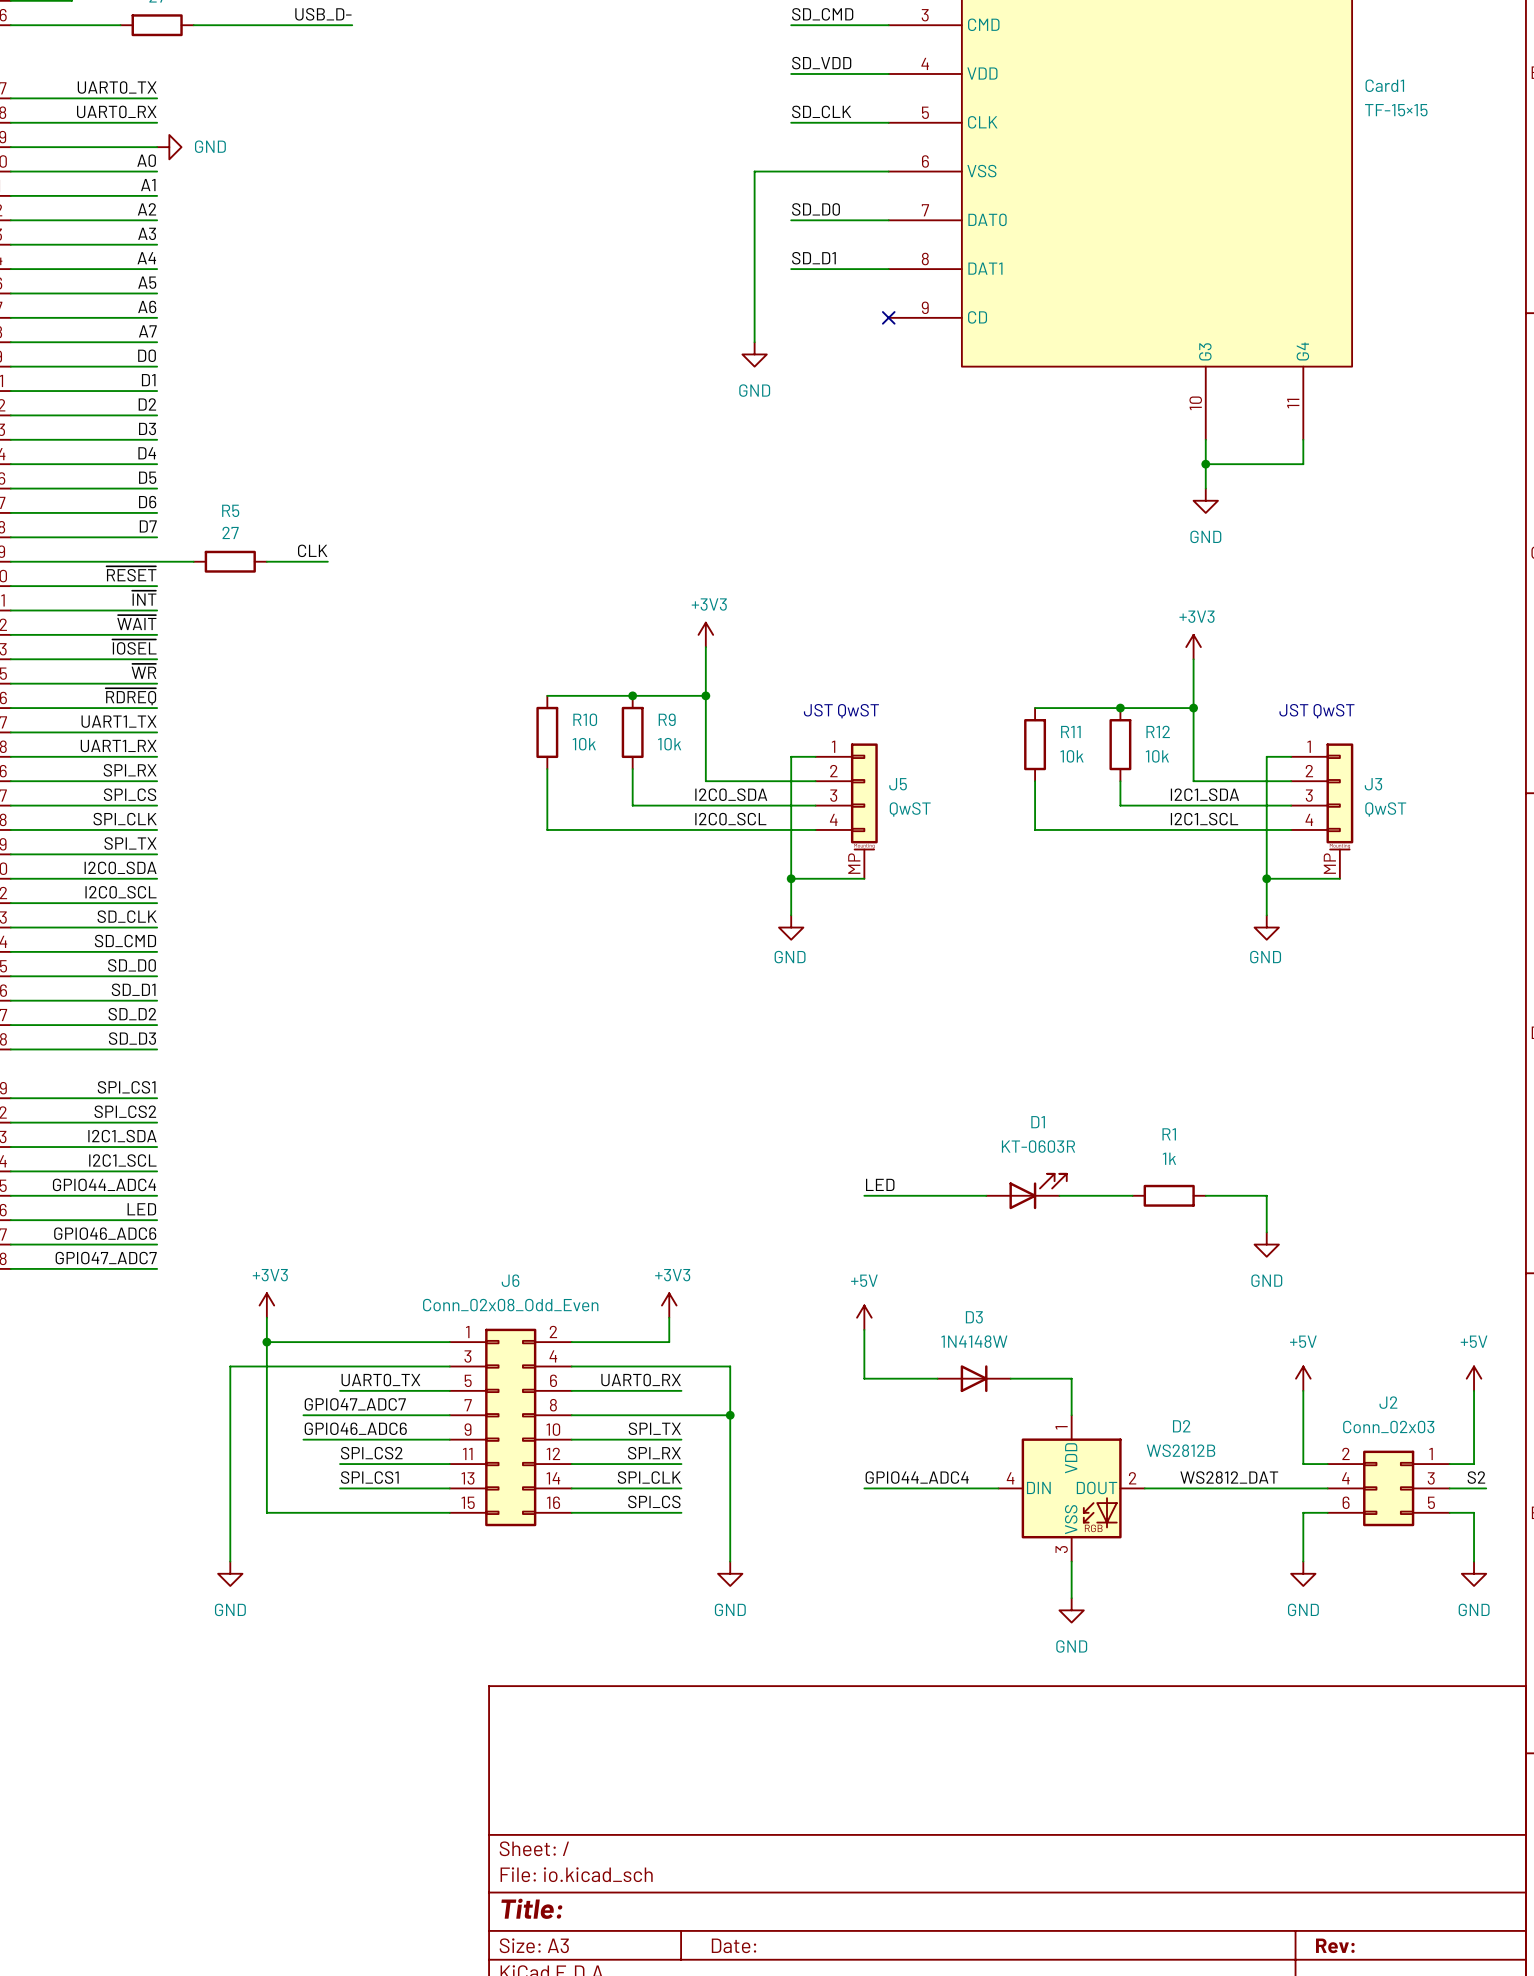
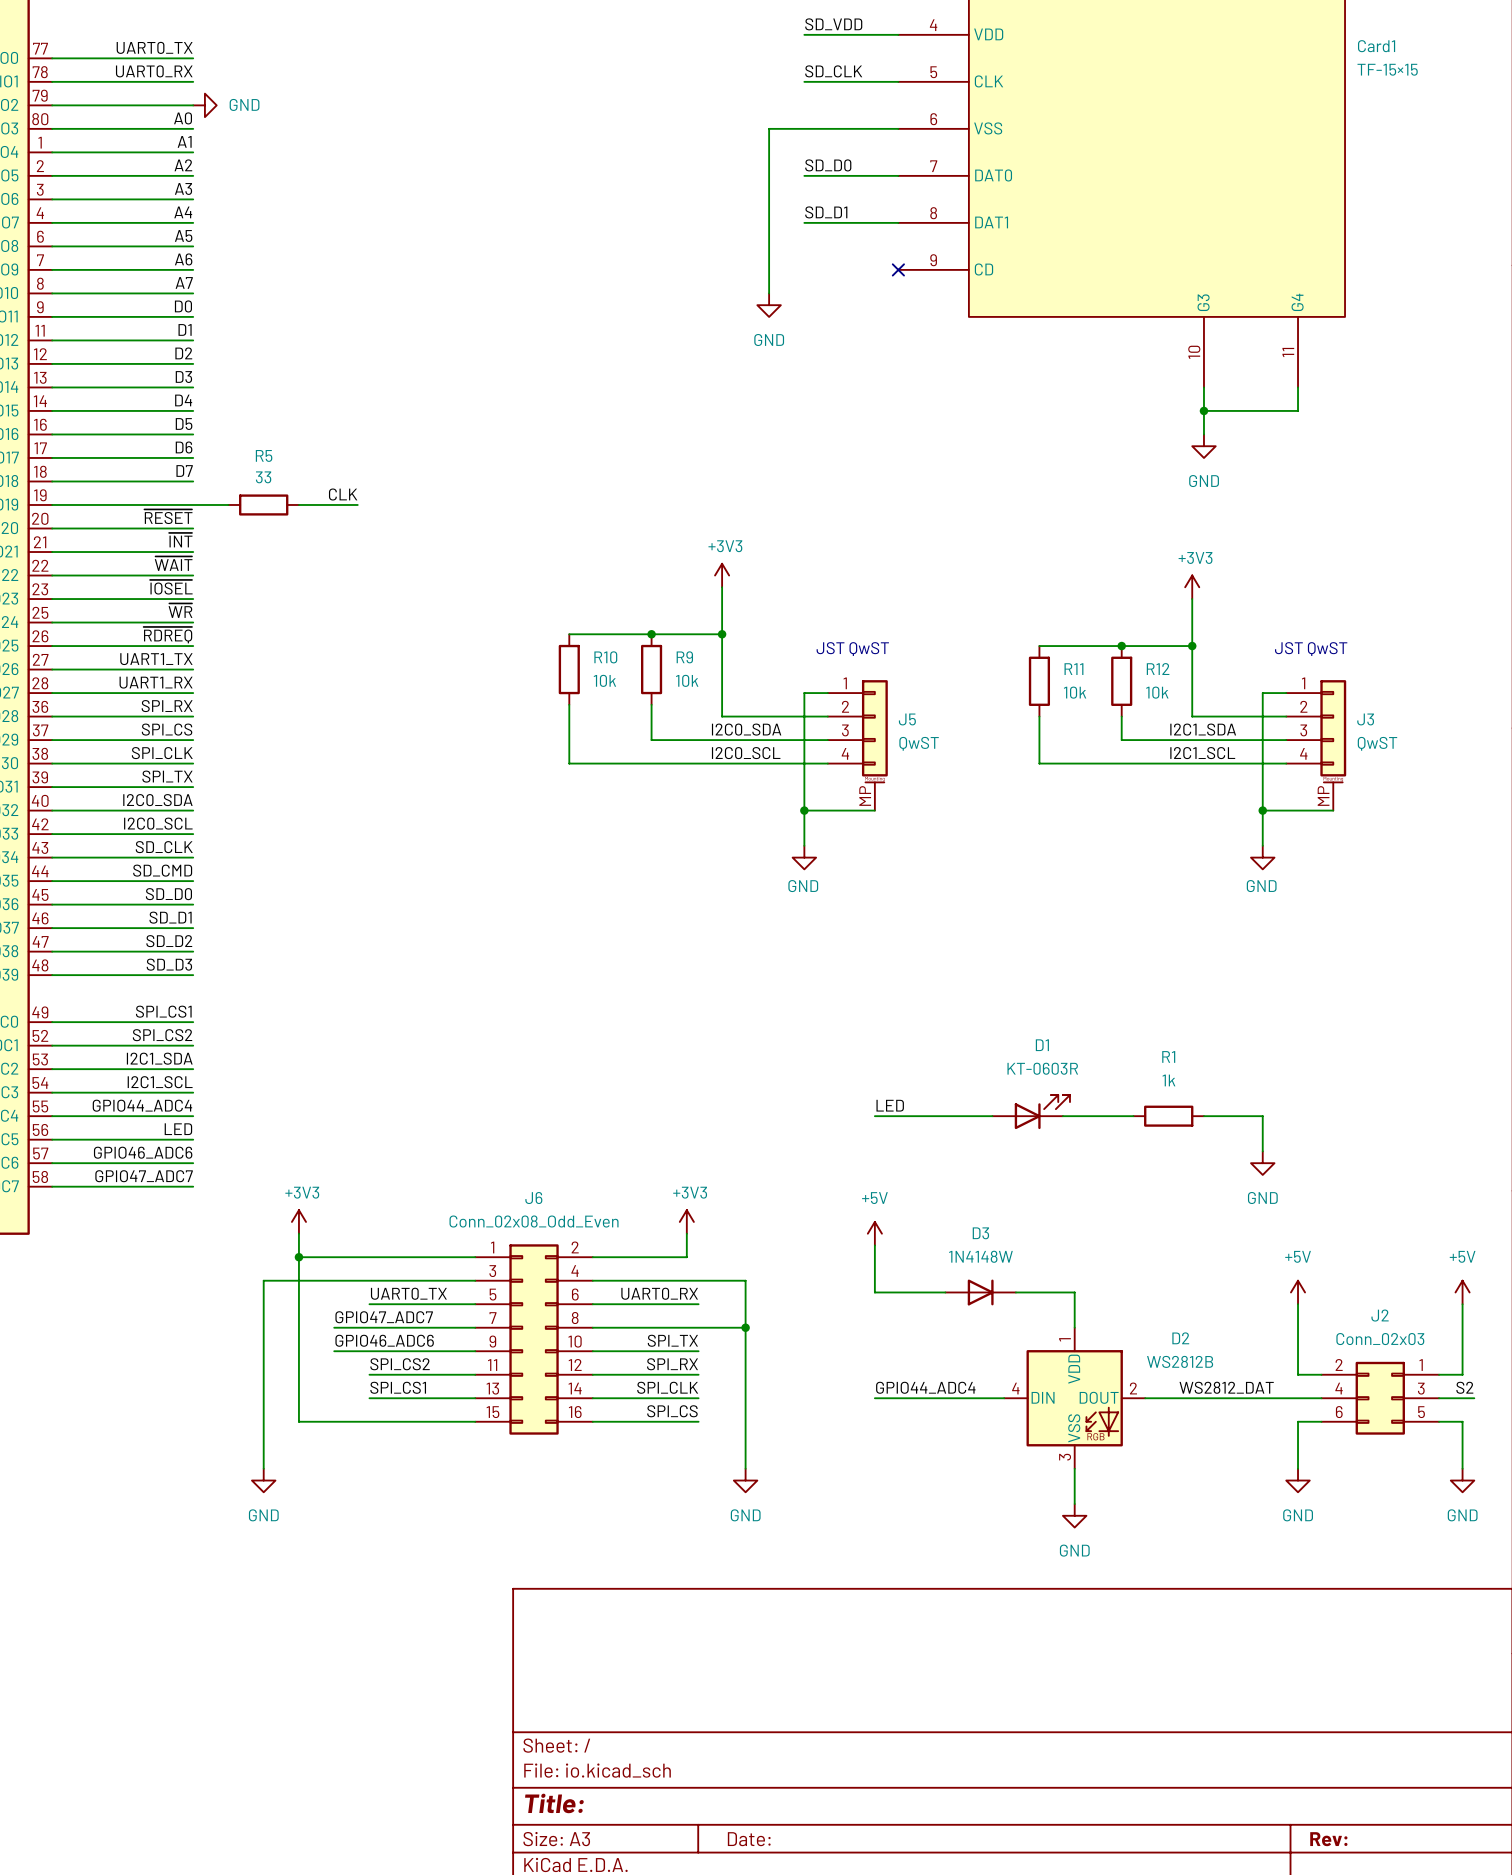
R5 value: 27 (230, 532) -> 33 (263, 477)

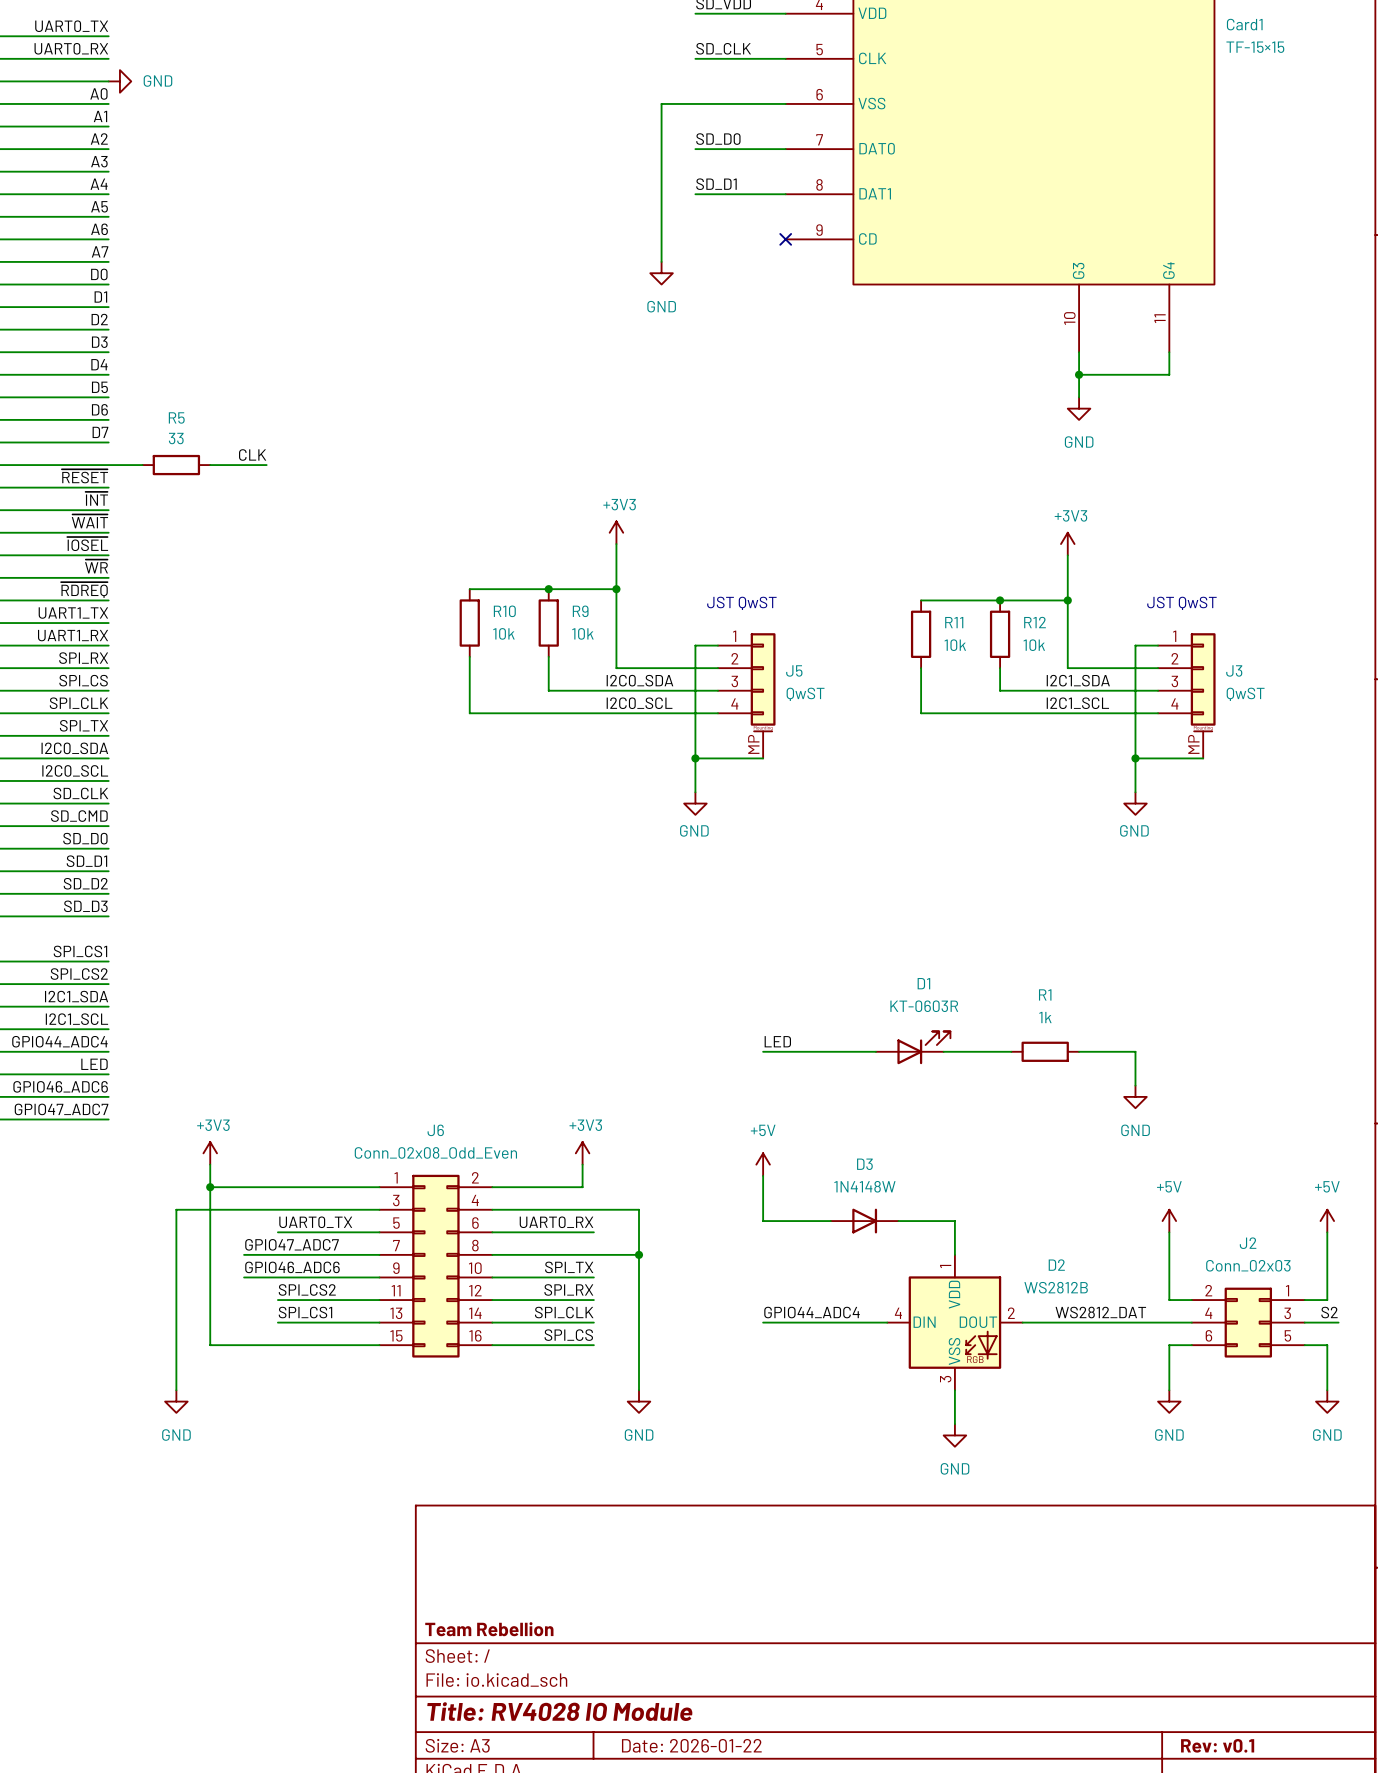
title block: none -> Team Rebellion (489, 1629)
title block: Title: (554, 1803) -> Title: RV4028 IO Module (559, 1711)
title block: Date: (749, 1839) -> Date: 2026-01-22 (691, 1745)
title block: Rev: (1328, 1839) -> Rev: v0.1 (1217, 1745)

